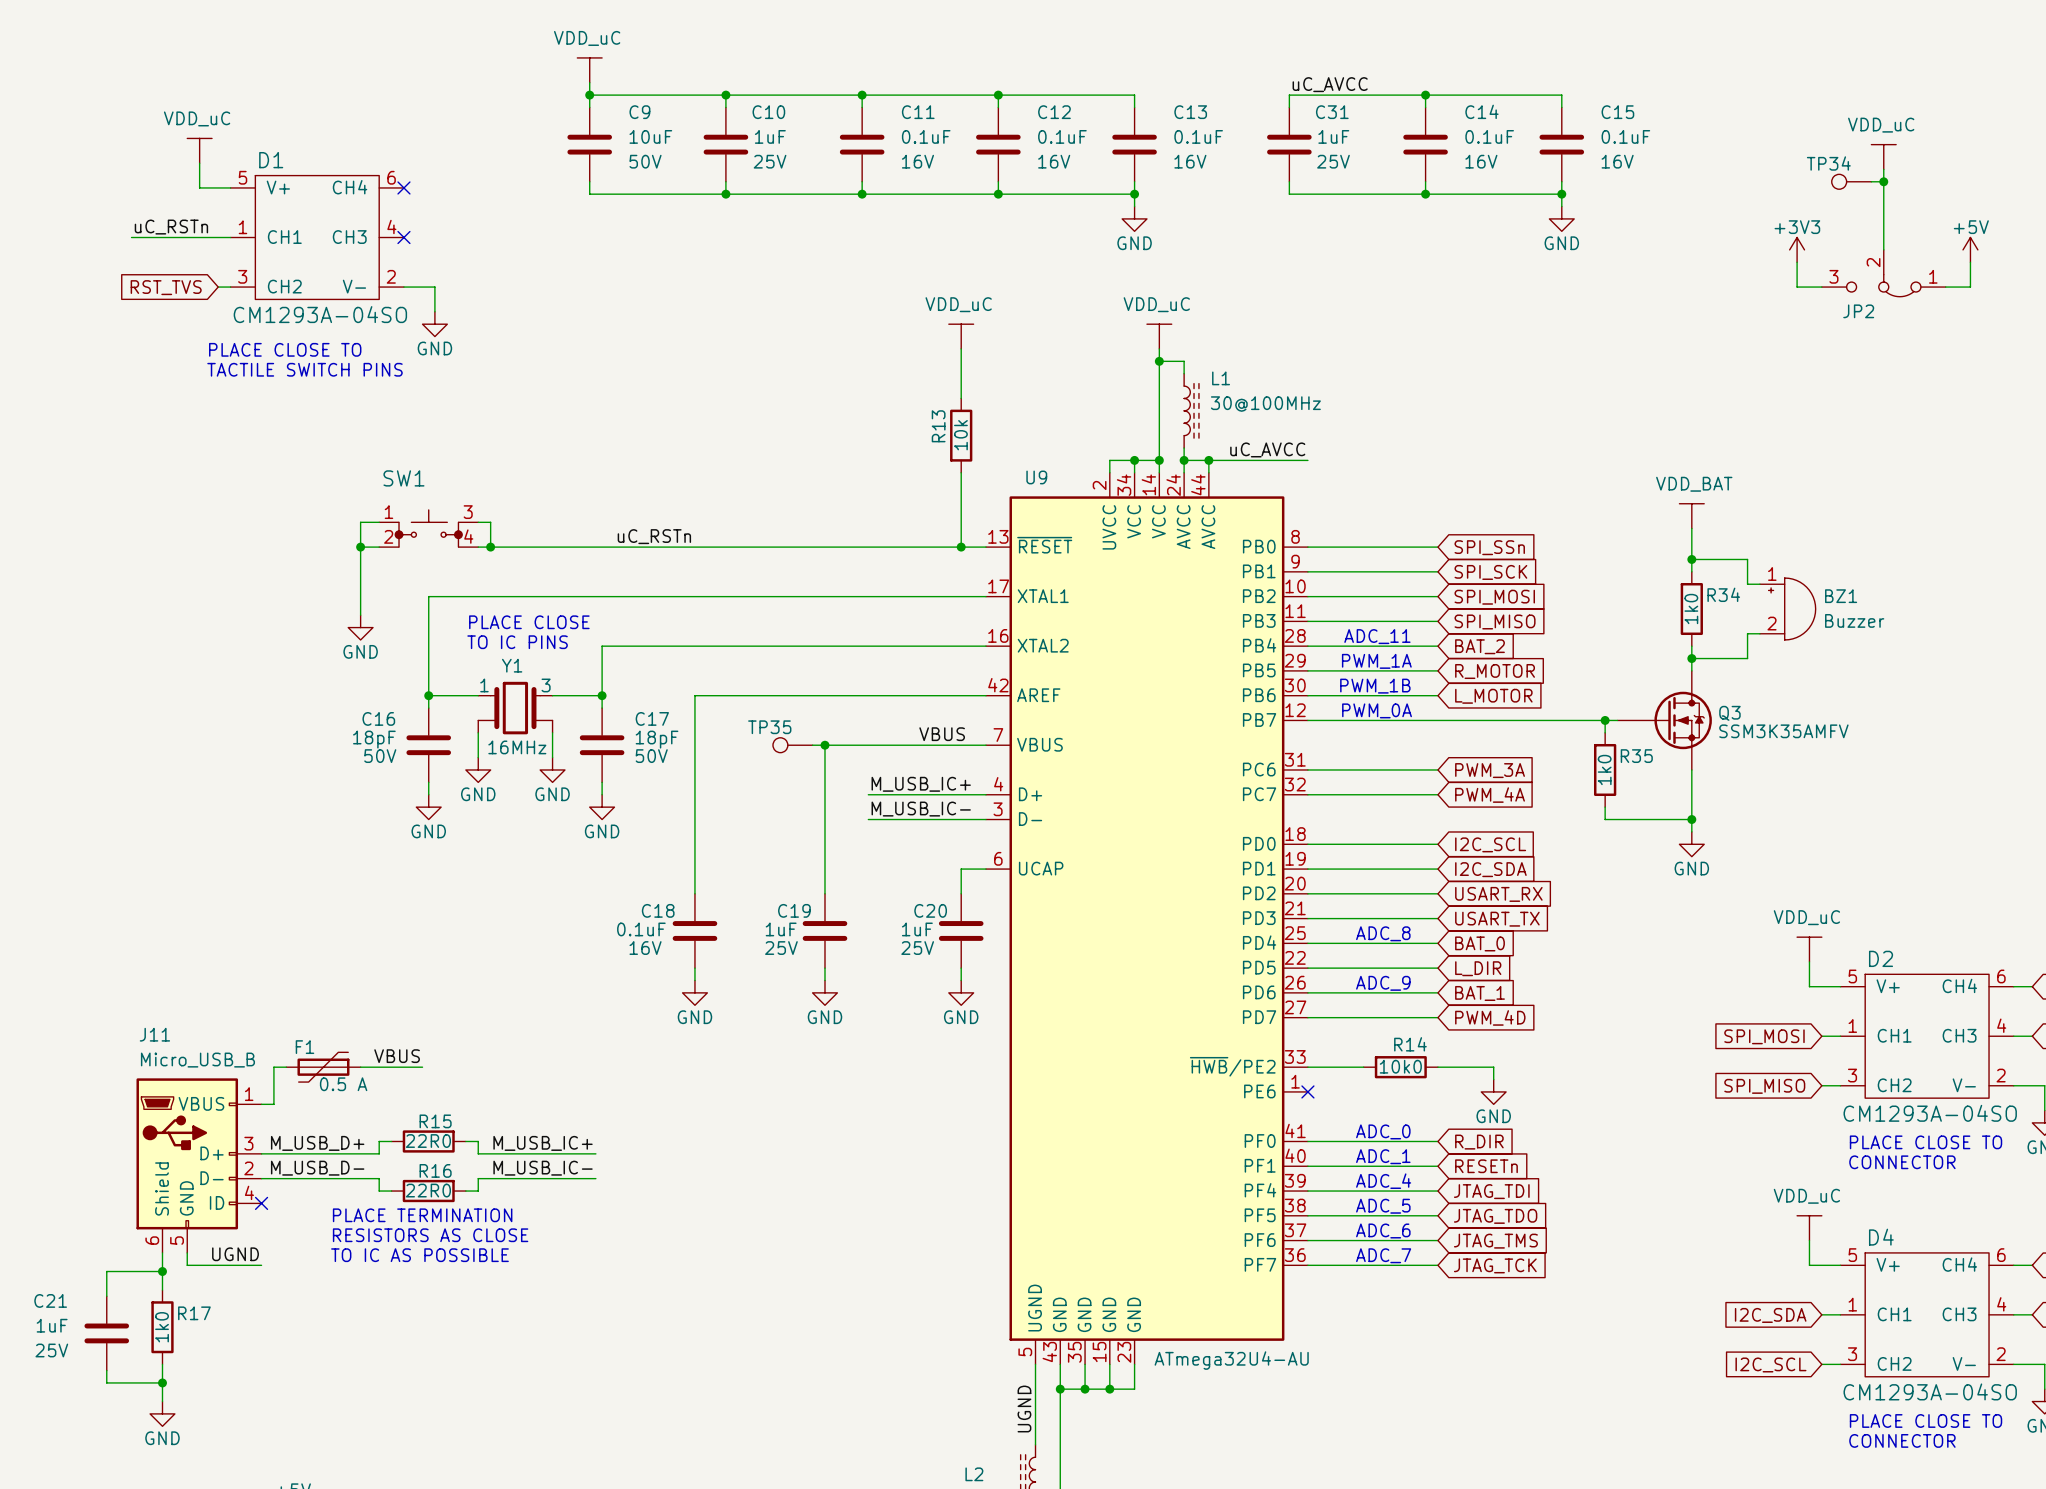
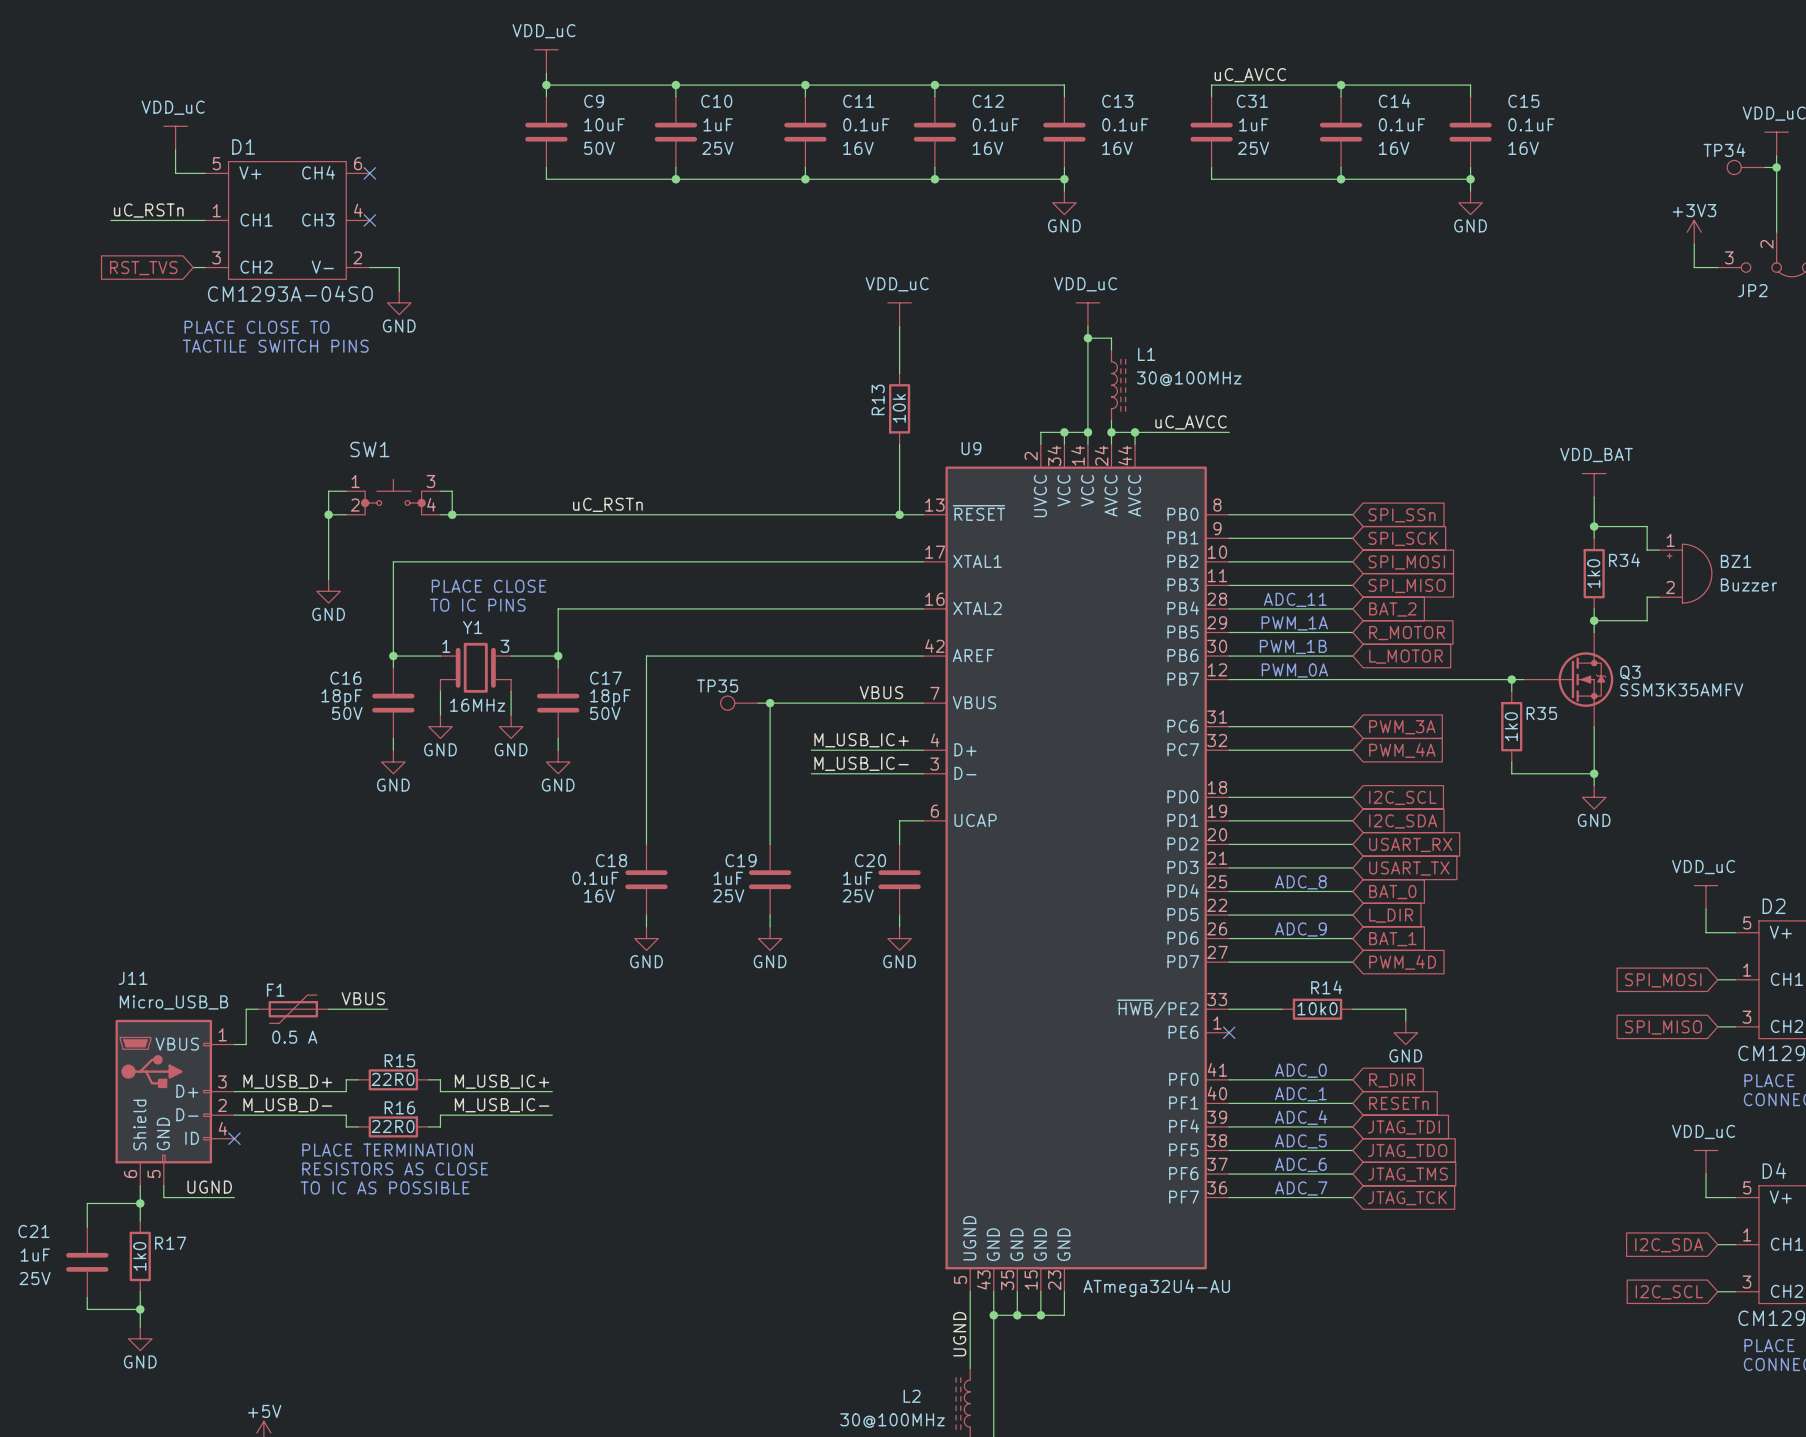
F1 text position: 0.5 A (343, 1084) -> 0.5 A (294, 1037)

